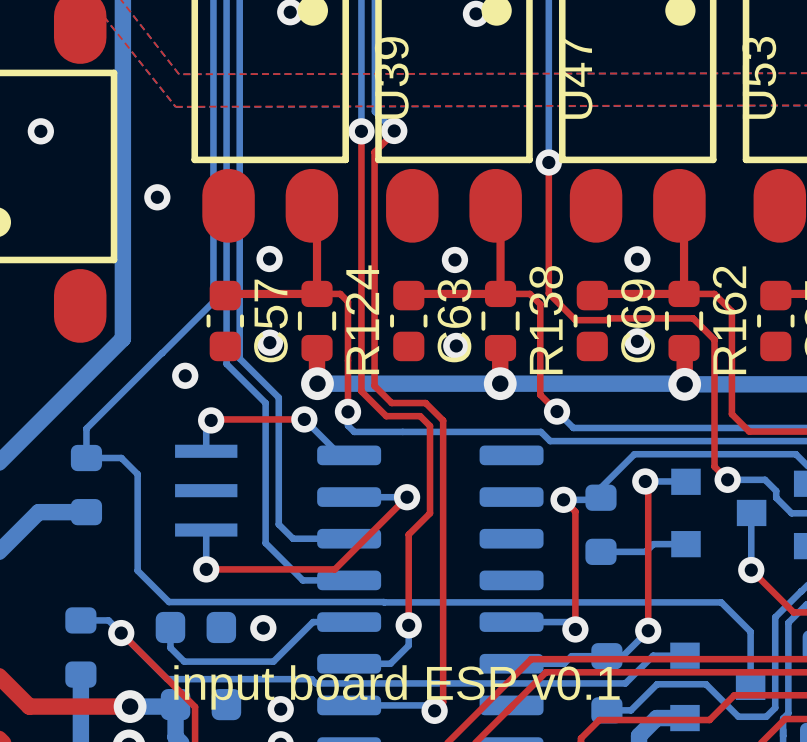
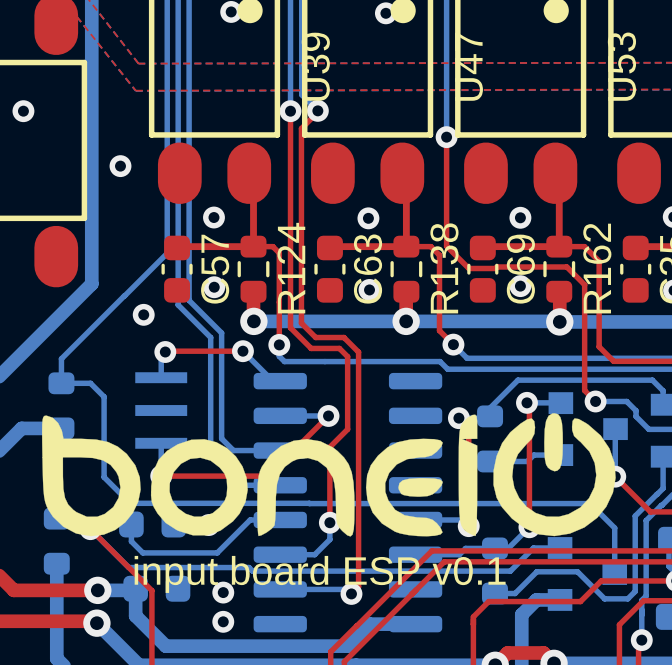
drawing: none -> [41, 413, 616, 537]

